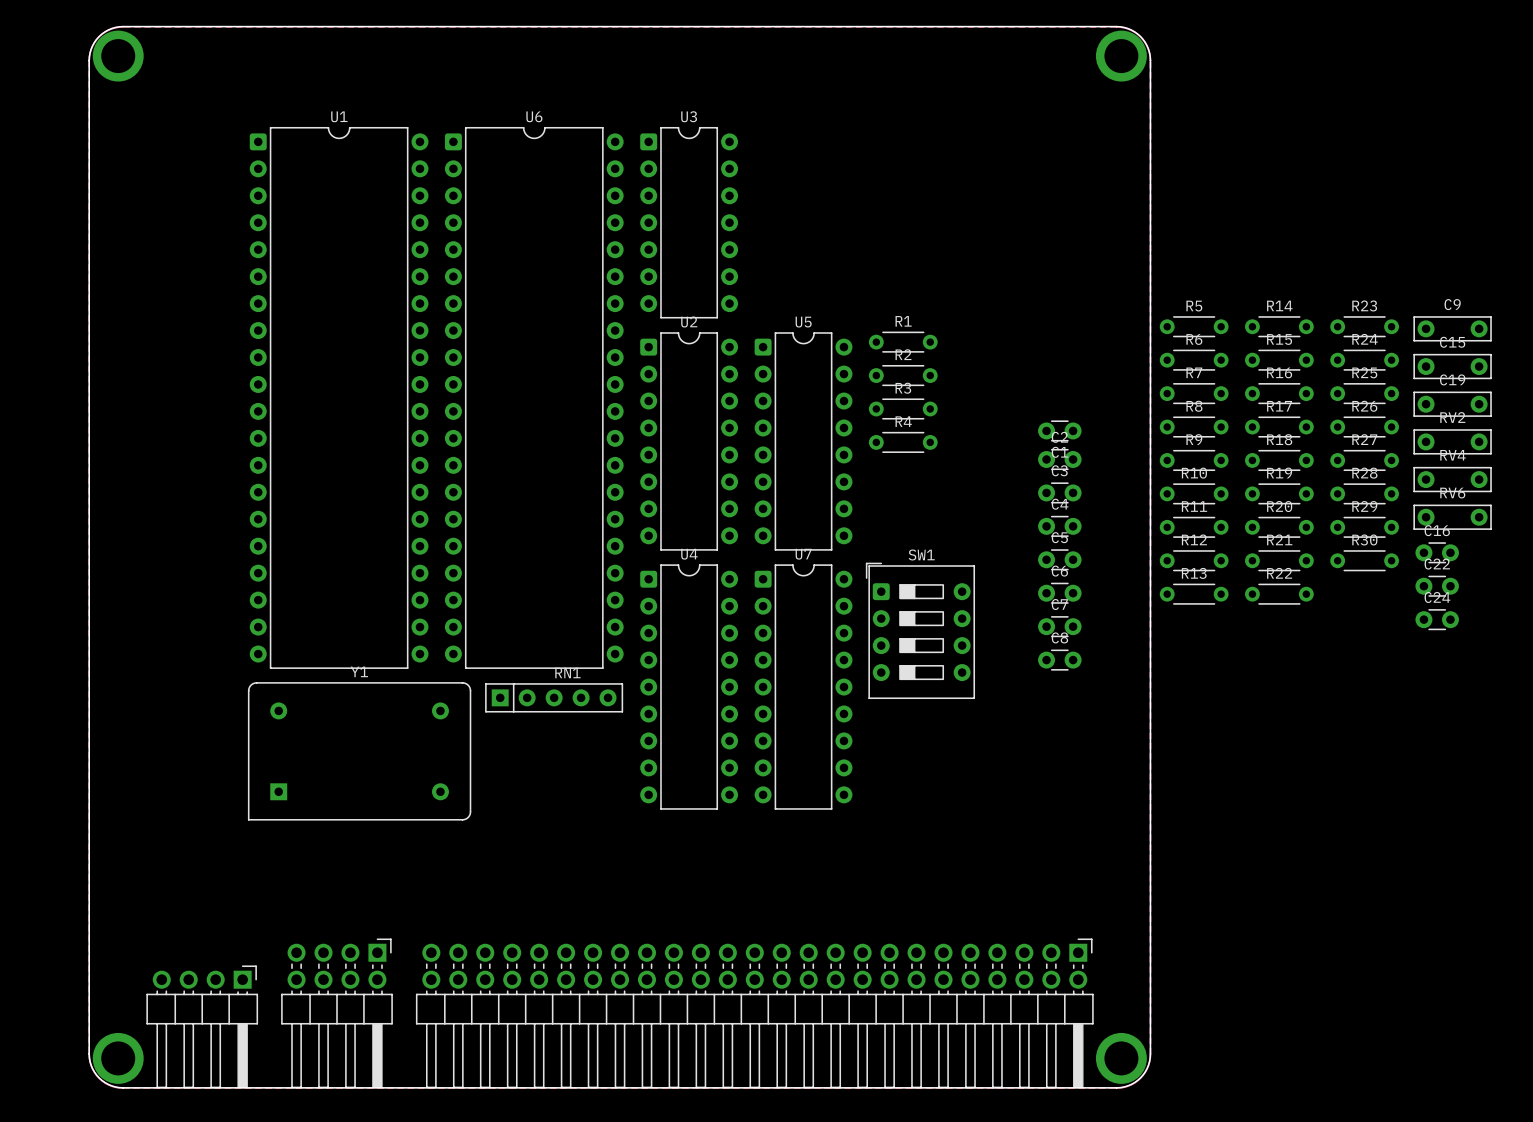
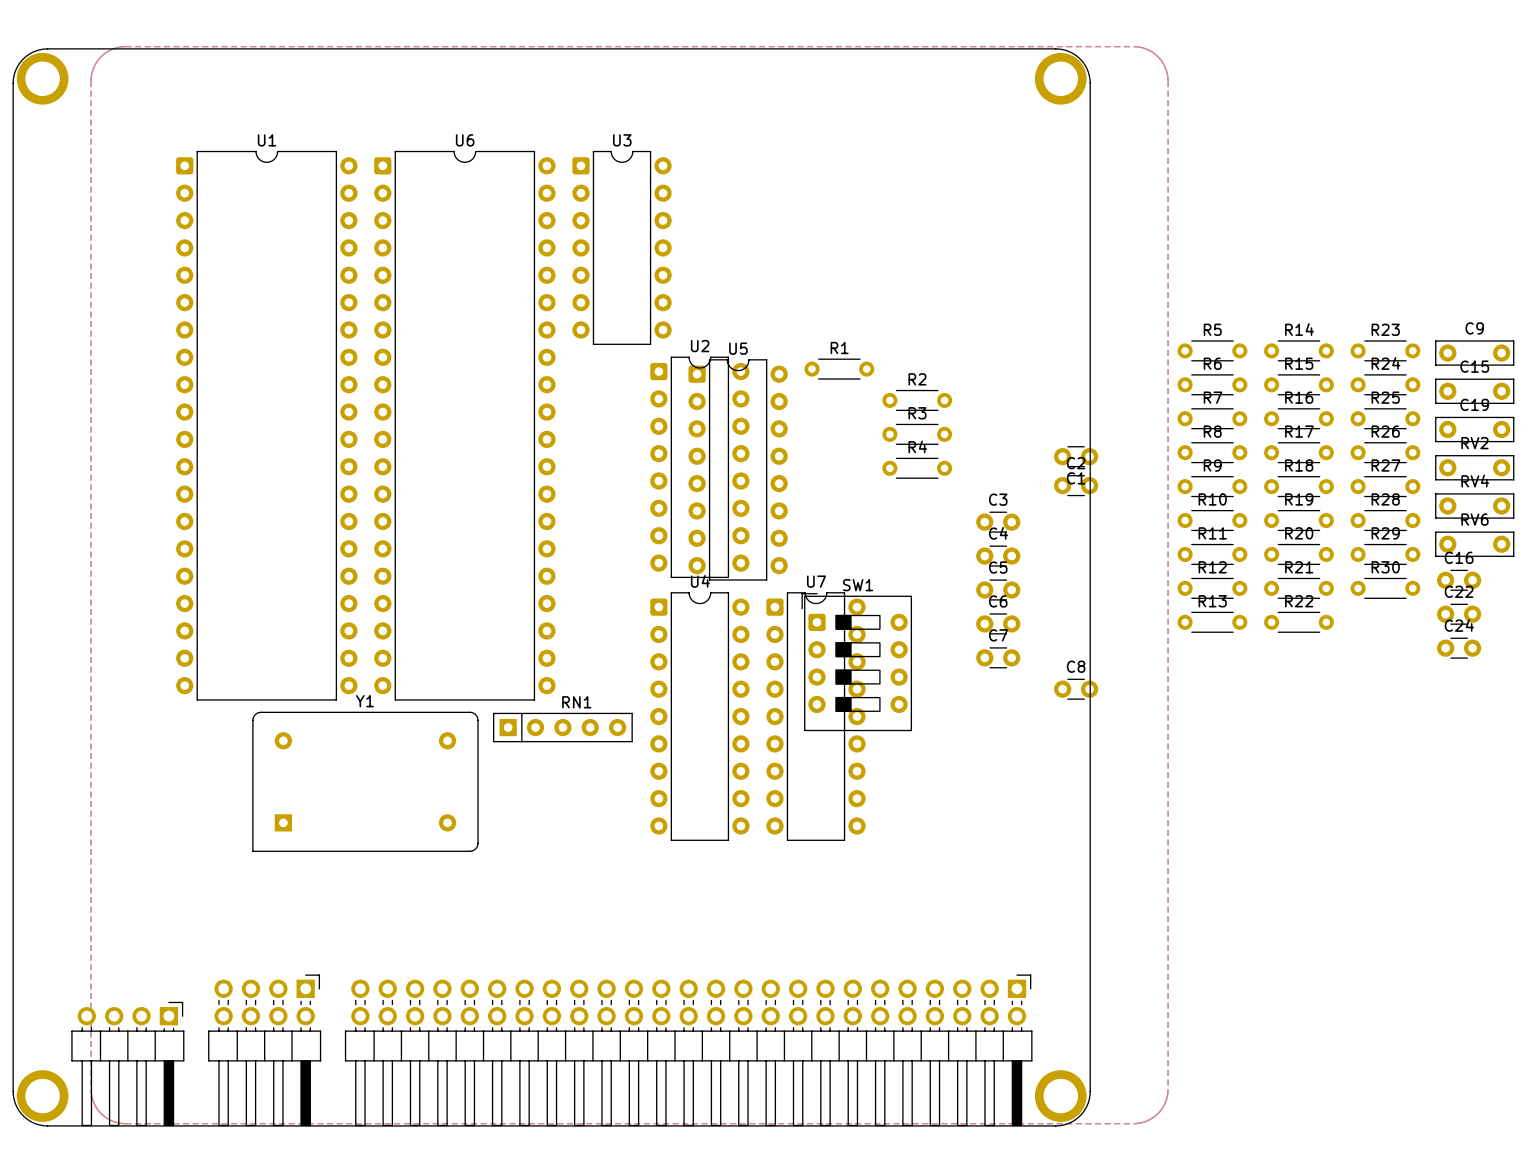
U3 position: (689, 222) -> (622, 247)
R1 position: (903, 342) -> (839, 369)
U1 position: (339, 397) -> (266, 425)
U6 position: (534, 397) -> (464, 425)
U5 position: (803, 441) -> (738, 469)
C3 position: (1059, 492) -> (998, 522)
C4 position: (1059, 526) -> (998, 556)
part position: (619, 557) -> (551, 587)
C5 position: (1059, 559) -> (998, 590)
C6 position: (1059, 593) -> (998, 623)
C7 position: (1059, 626) -> (998, 657)
SW1 position: (920, 630) -> (856, 662)

